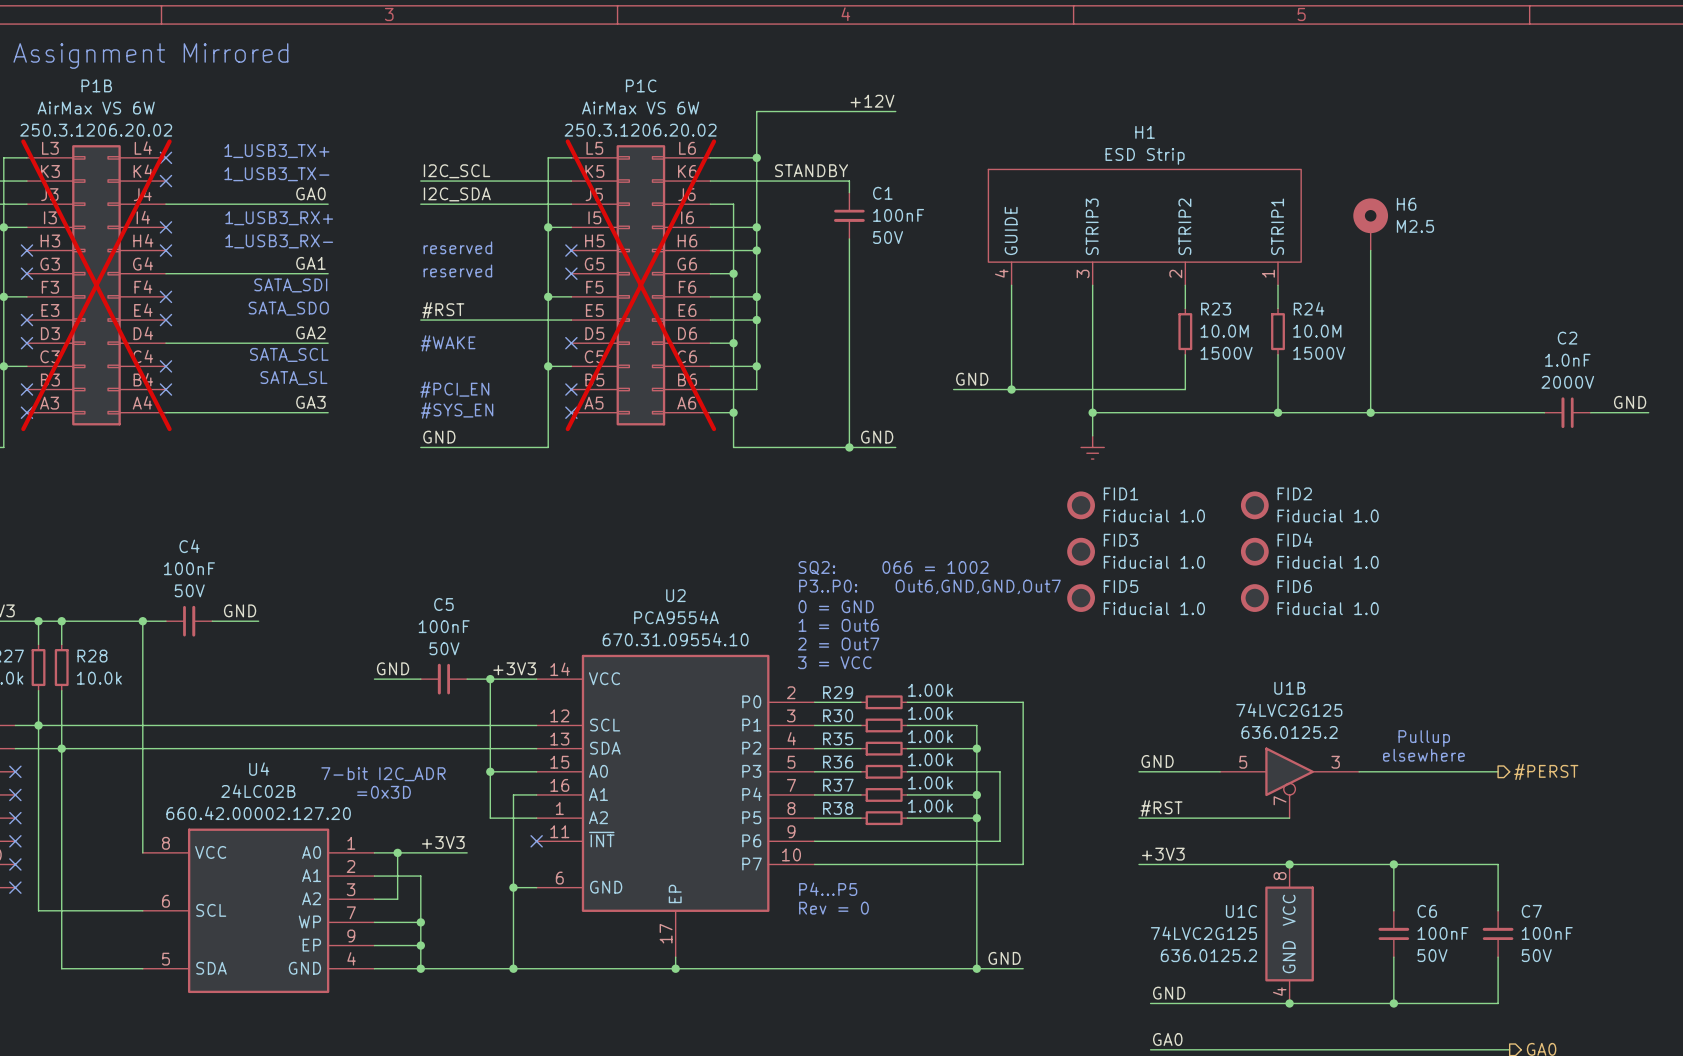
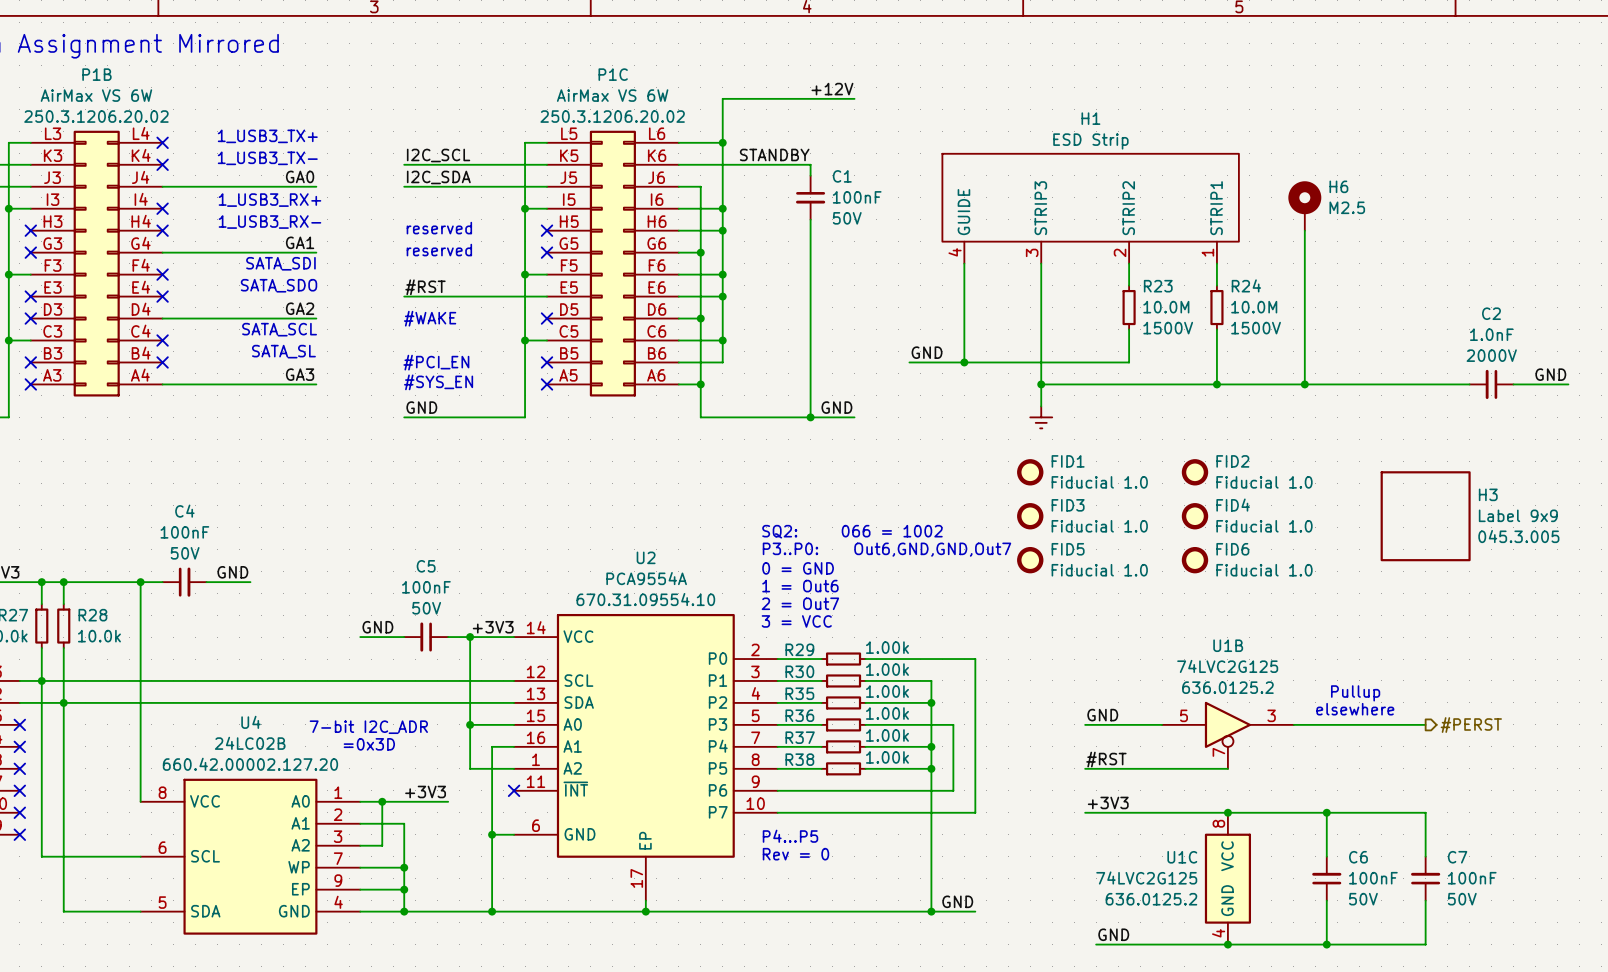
P1B do-not-place cross: (96, 285) -> none
P1C do-not-place cross: (640, 285) -> none
H3: none -> Label 9x9 (1425, 516)

